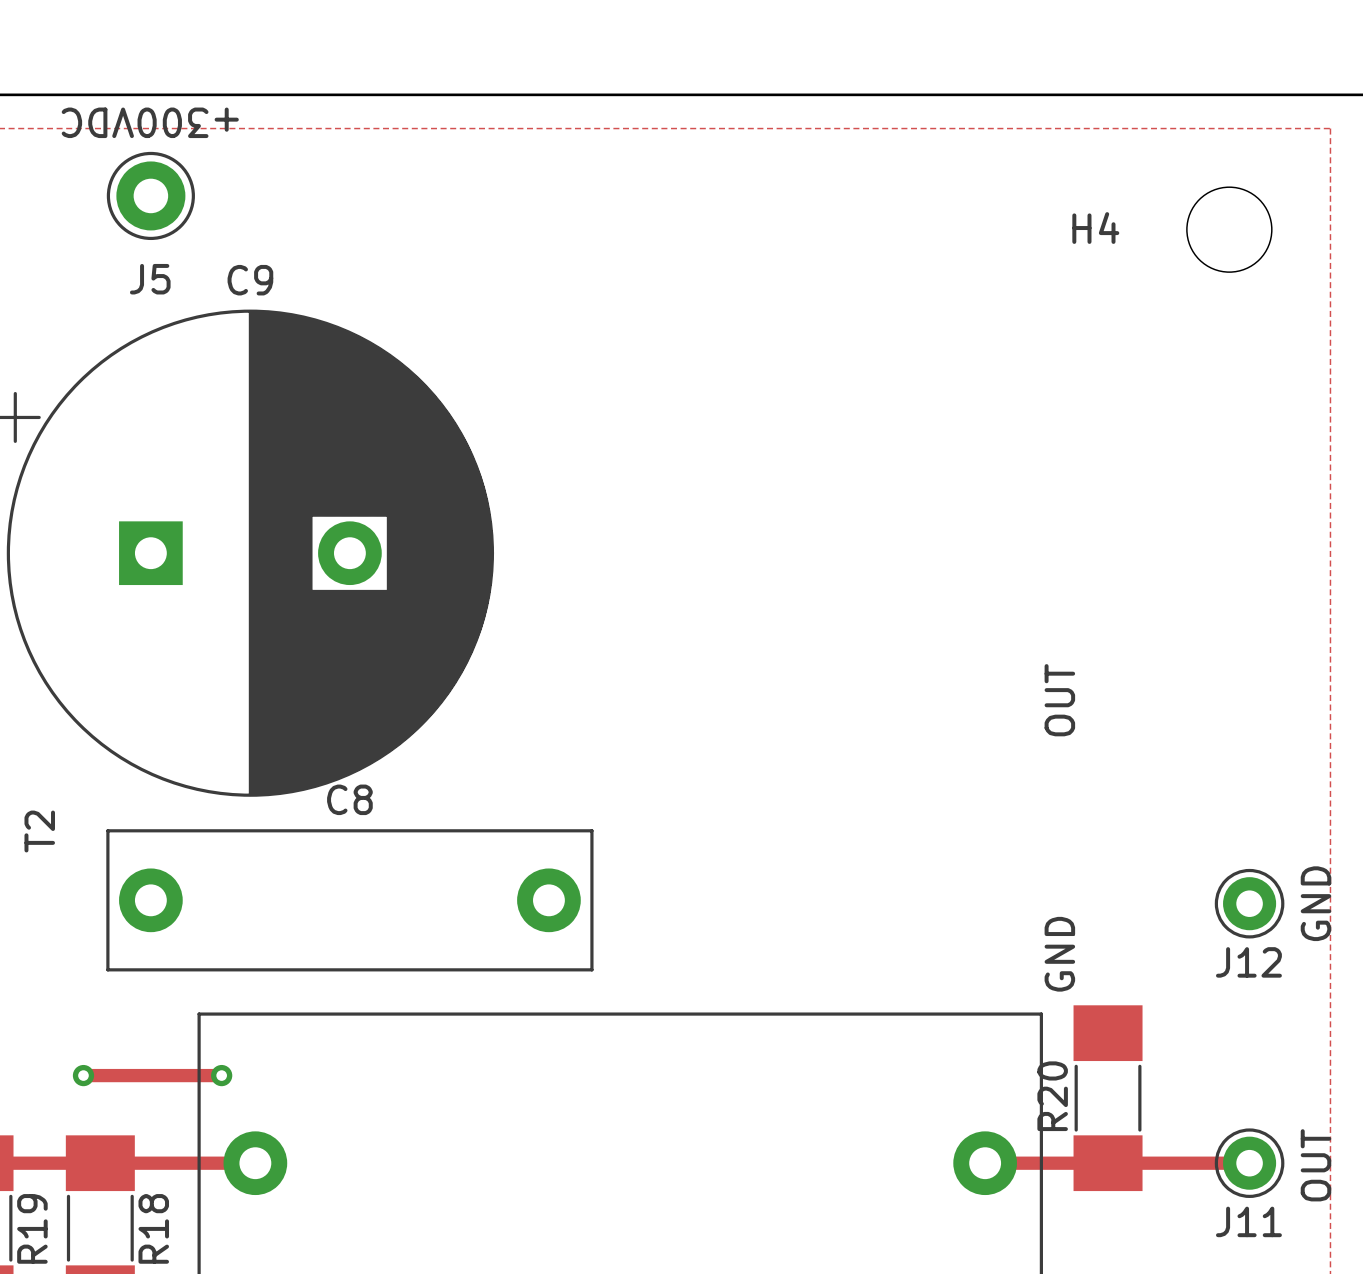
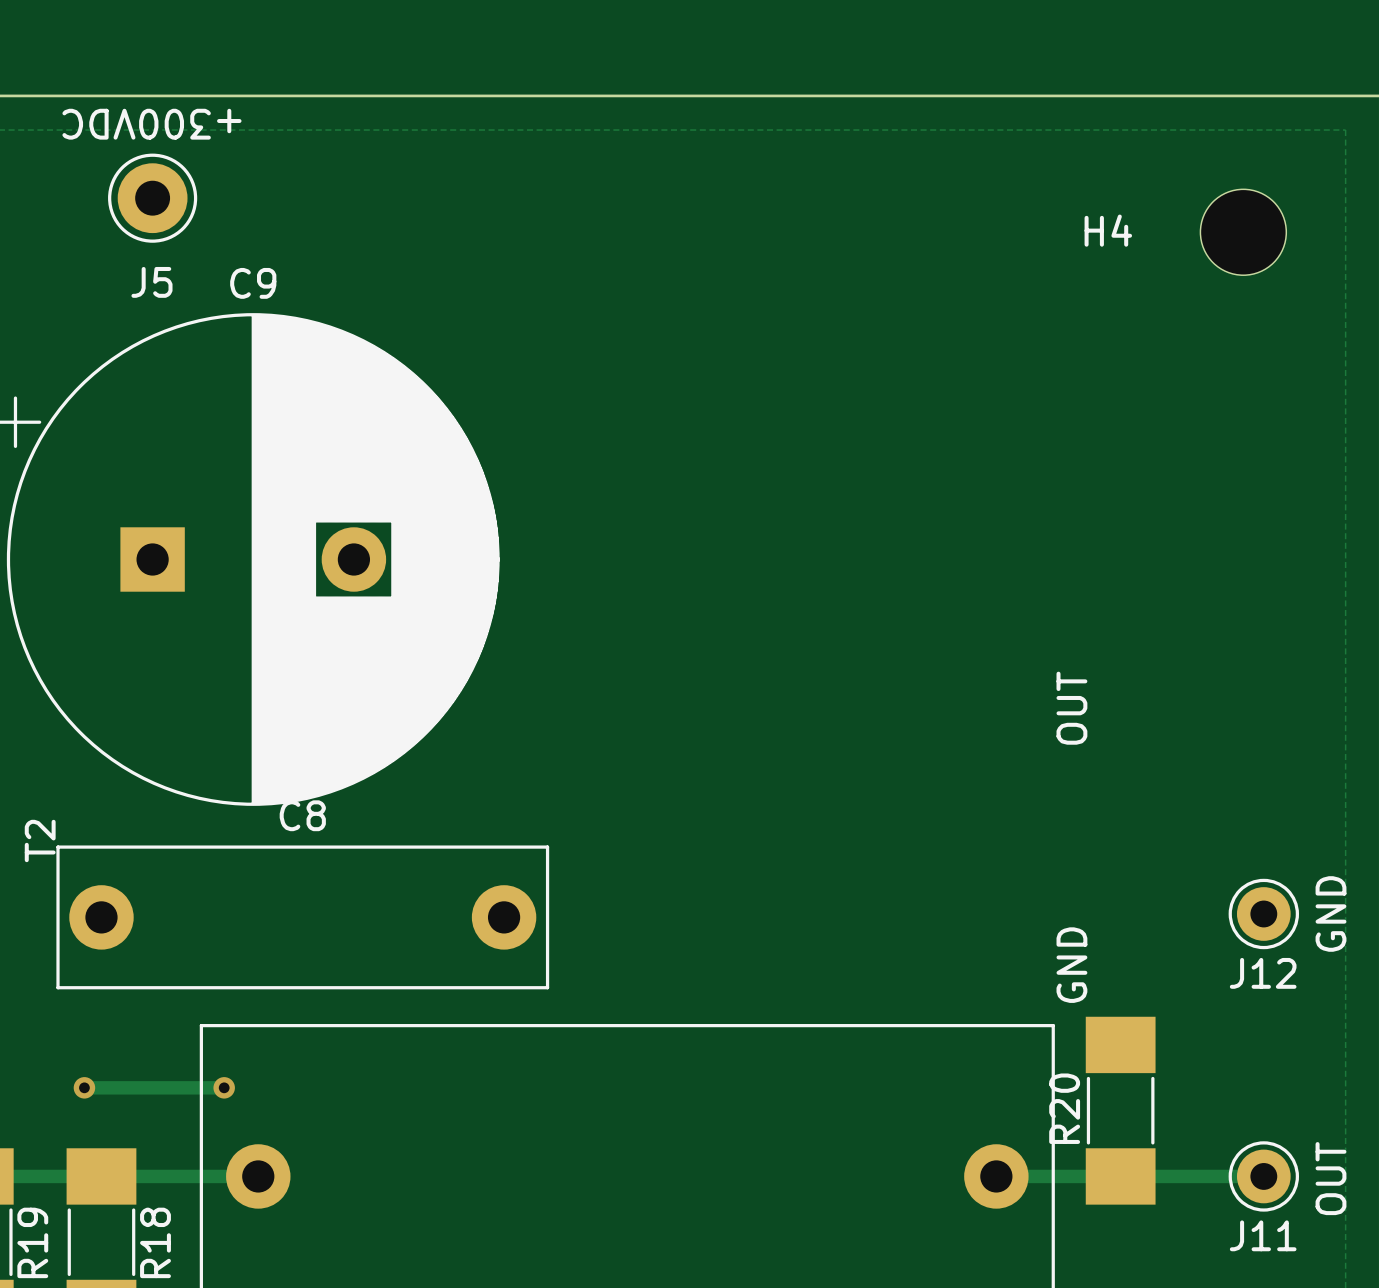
C8 position: (349, 900) -> (302, 917)

